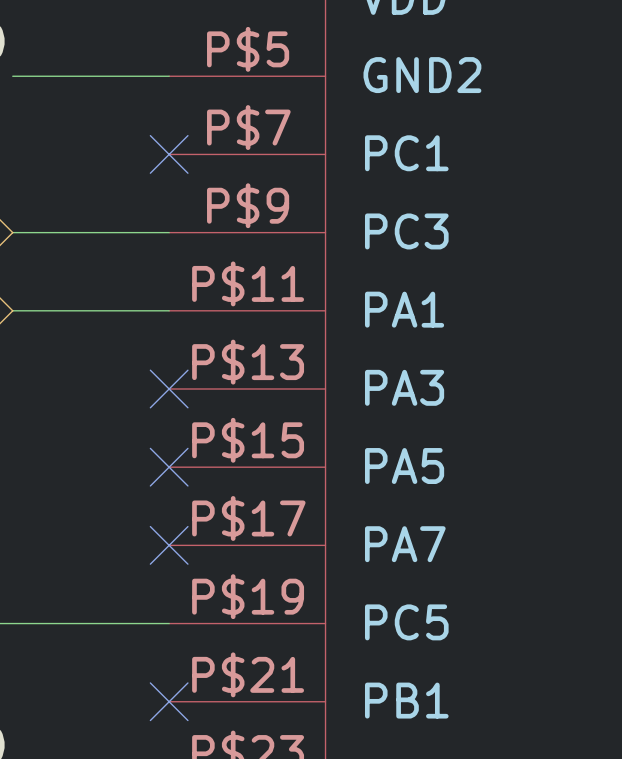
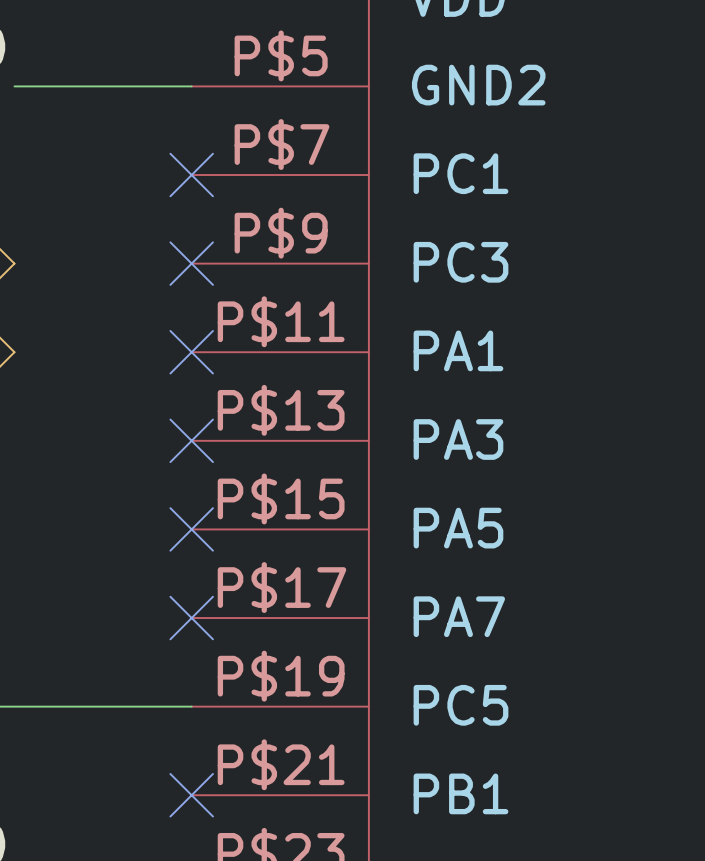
wire: (12, 232) (169, 232) -> none
no-connect mark: none -> (191, 263)
wire: (12, 310) (169, 310) -> none
no-connect mark: none -> (191, 352)

